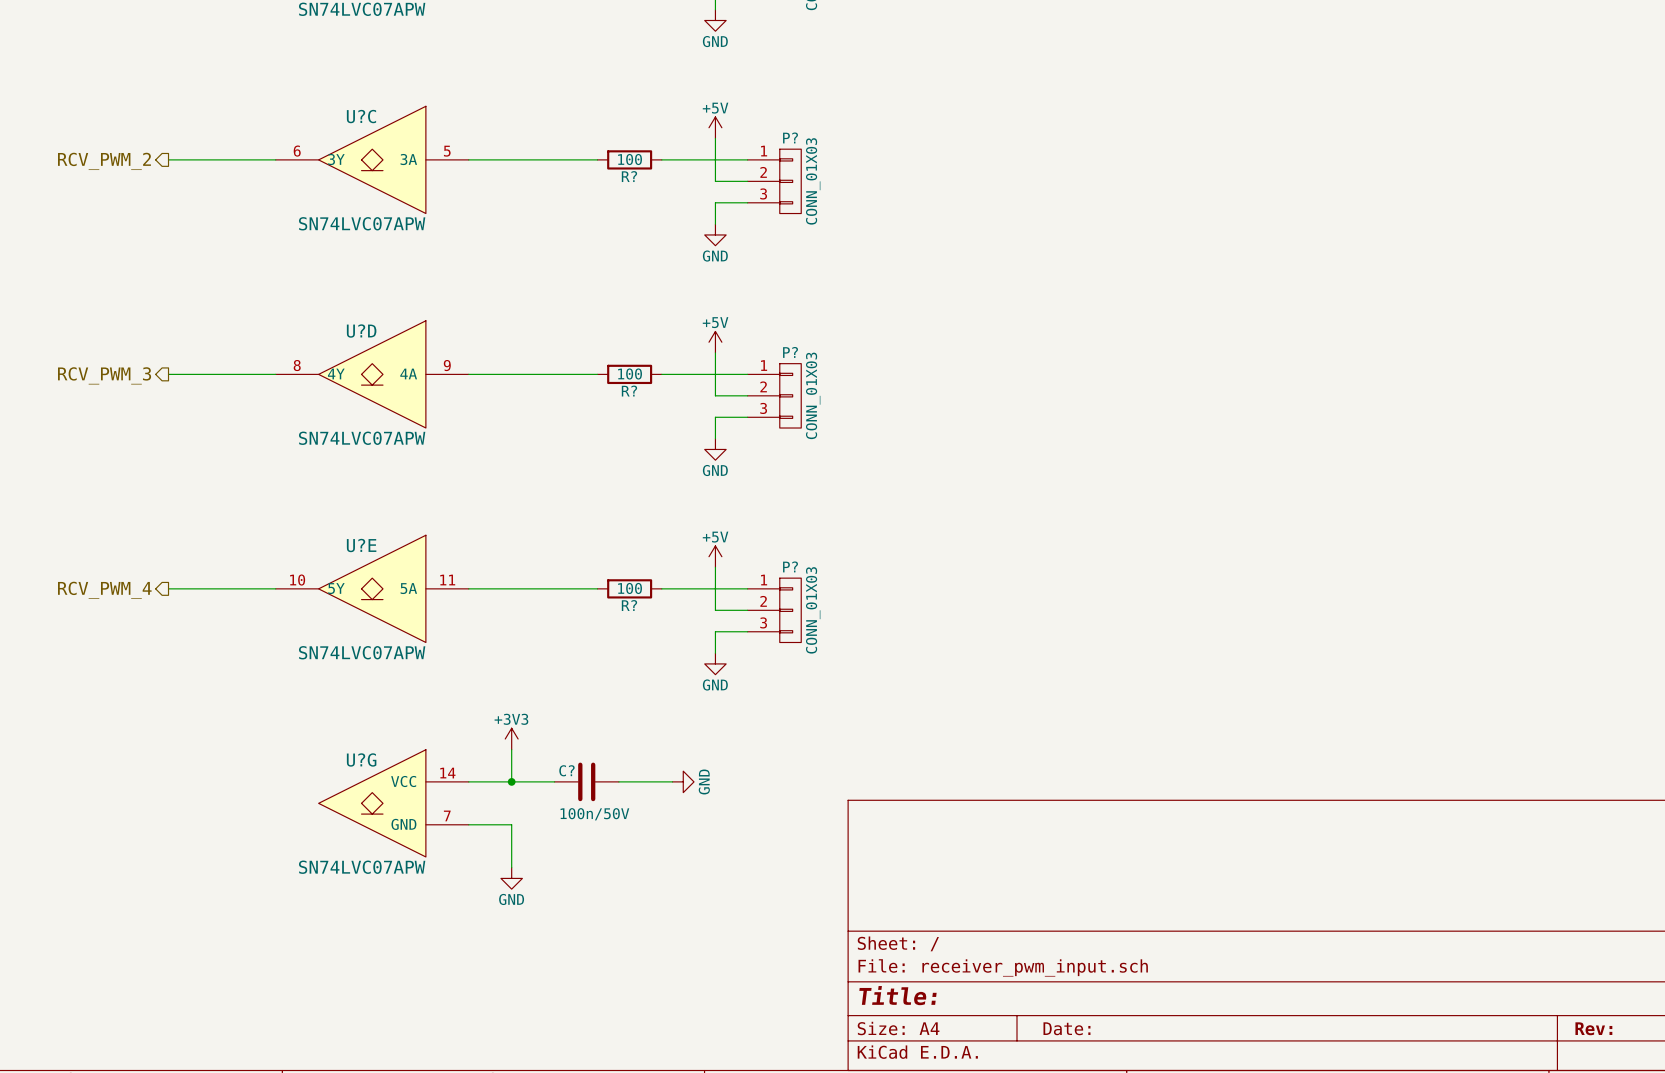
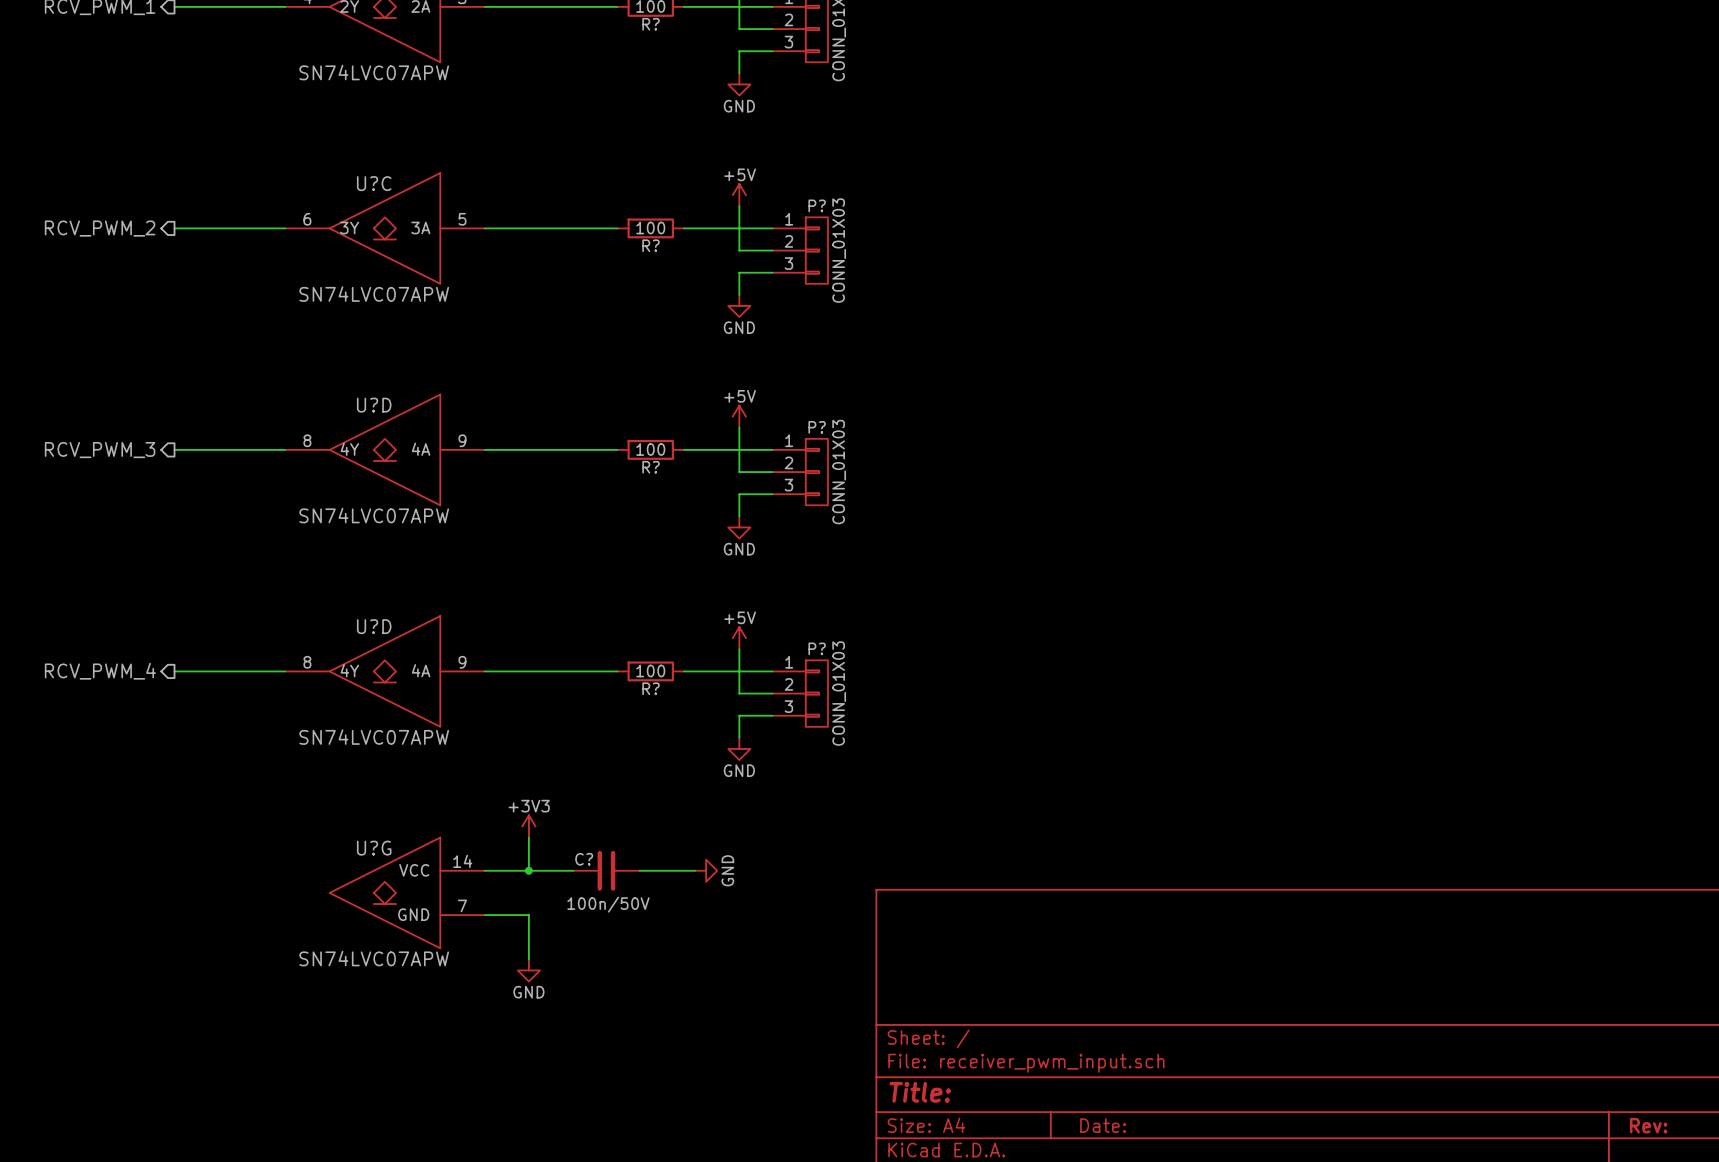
U?E name: U?E (361, 545) -> U?D (374, 626)
U?E pin number: 10 (297, 580) -> 8 (307, 662)
U?E pin number: 11 (447, 580) -> 9 (462, 662)
U?E pin name: 5Y (336, 588) -> 4Y (349, 670)
U?E pin name: 5A (408, 588) -> 4A (421, 670)

